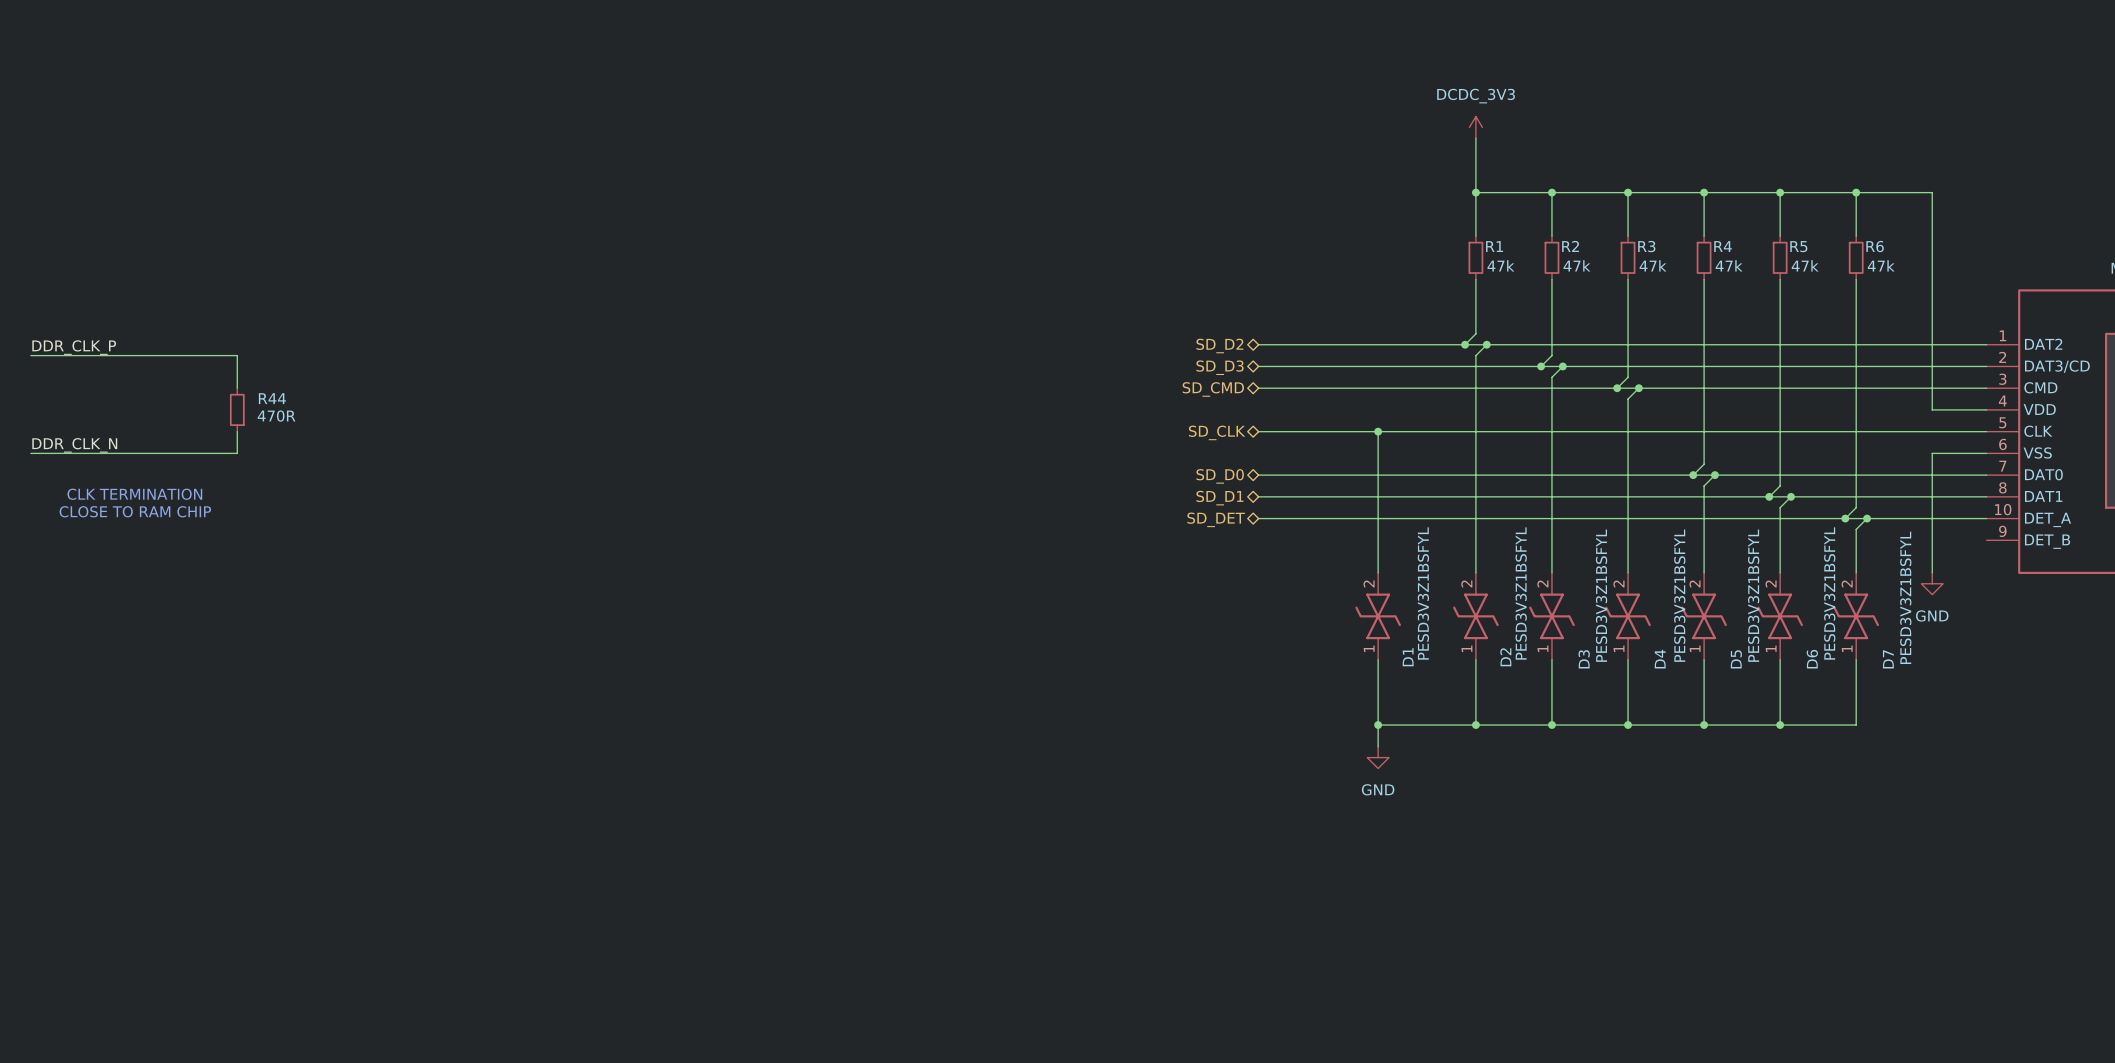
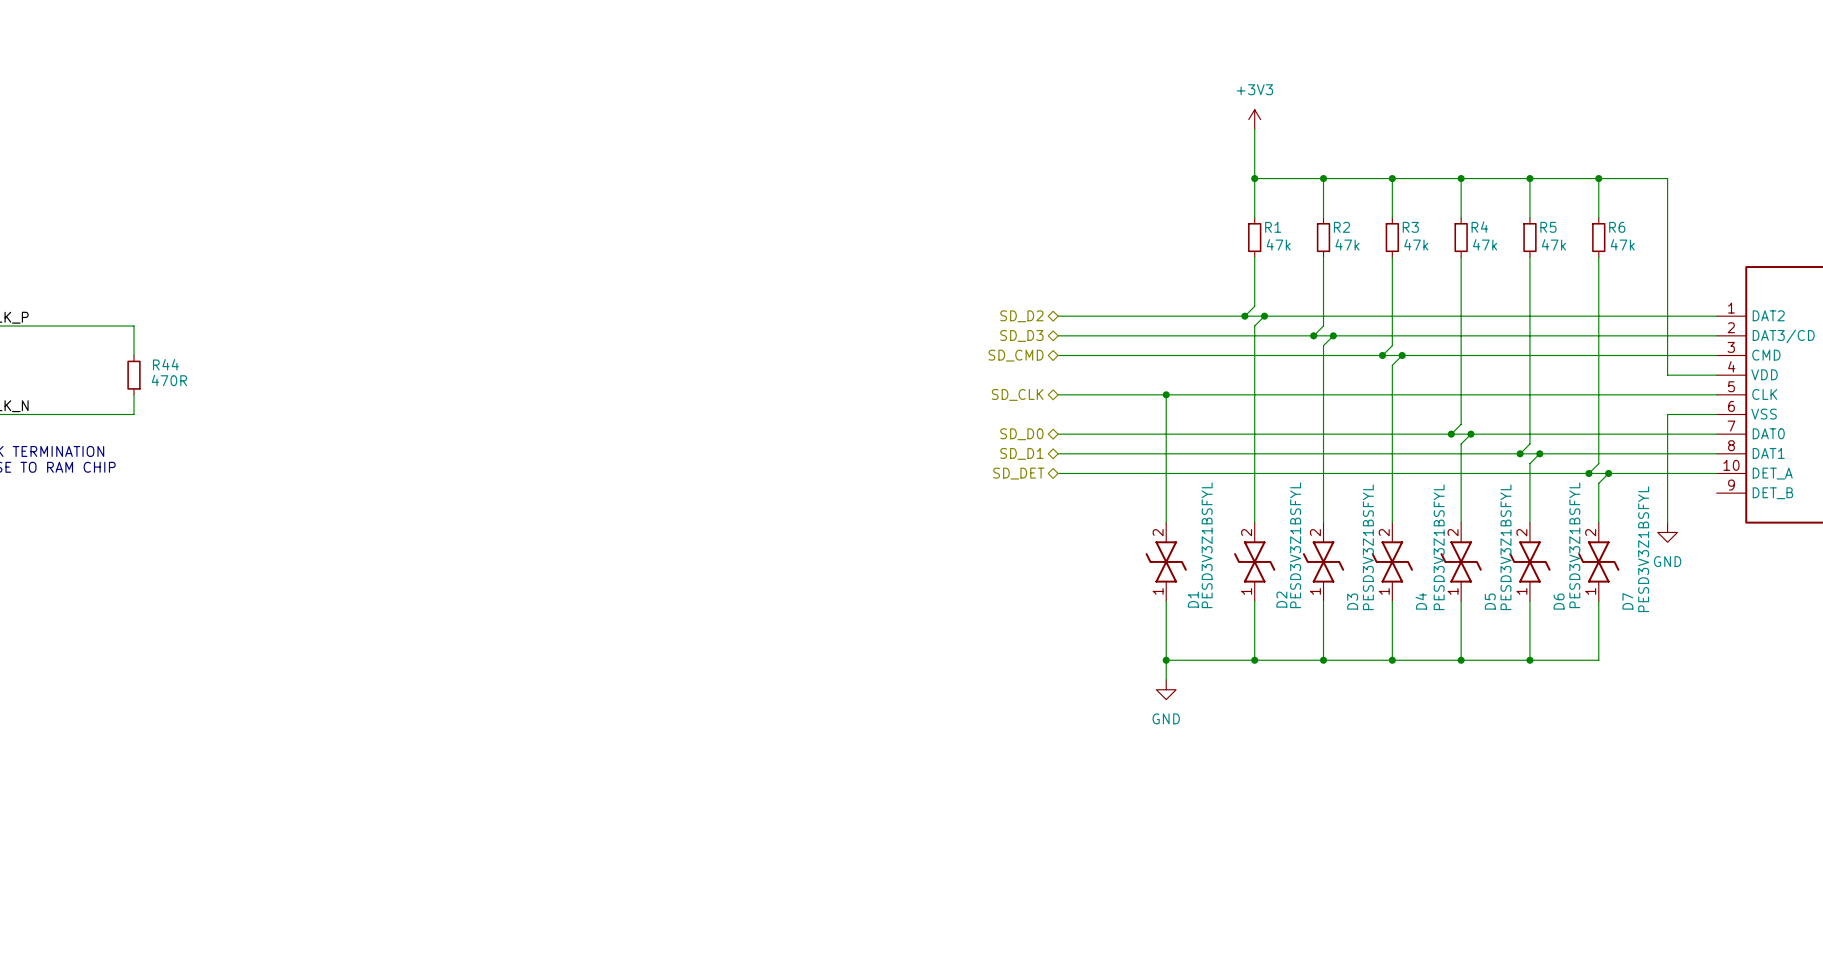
power symbol: DCDC_3V3 (1475, 127) -> +3V3 (1254, 119)

